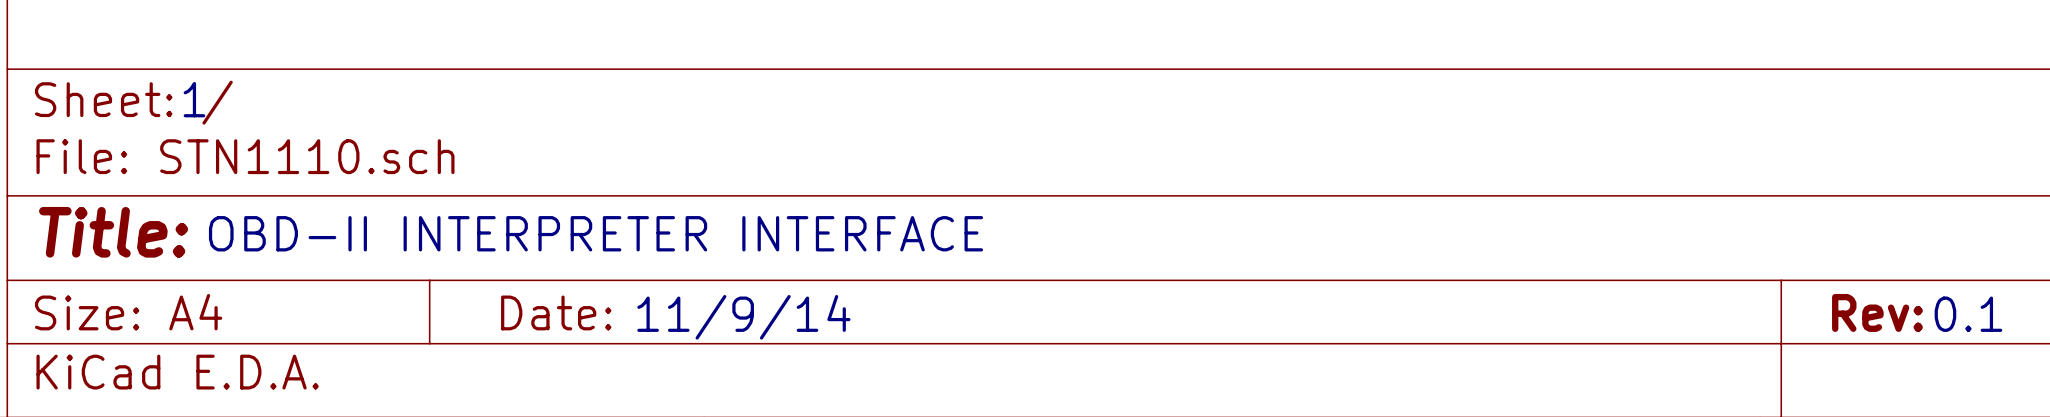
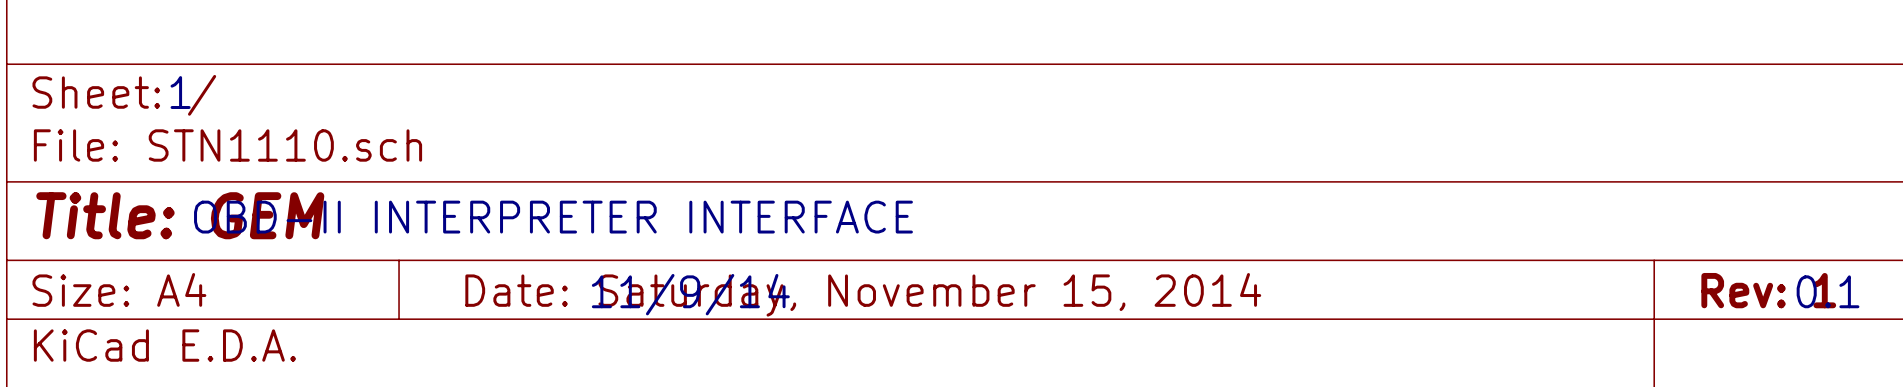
title block: Title: (113, 232) -> Title: GEM (180, 215)
title block: Date: (556, 312) -> Date: Saturday, November 15, 2014 (863, 294)
title block: Rev: (1877, 312) -> Rev: 1 (1768, 290)

